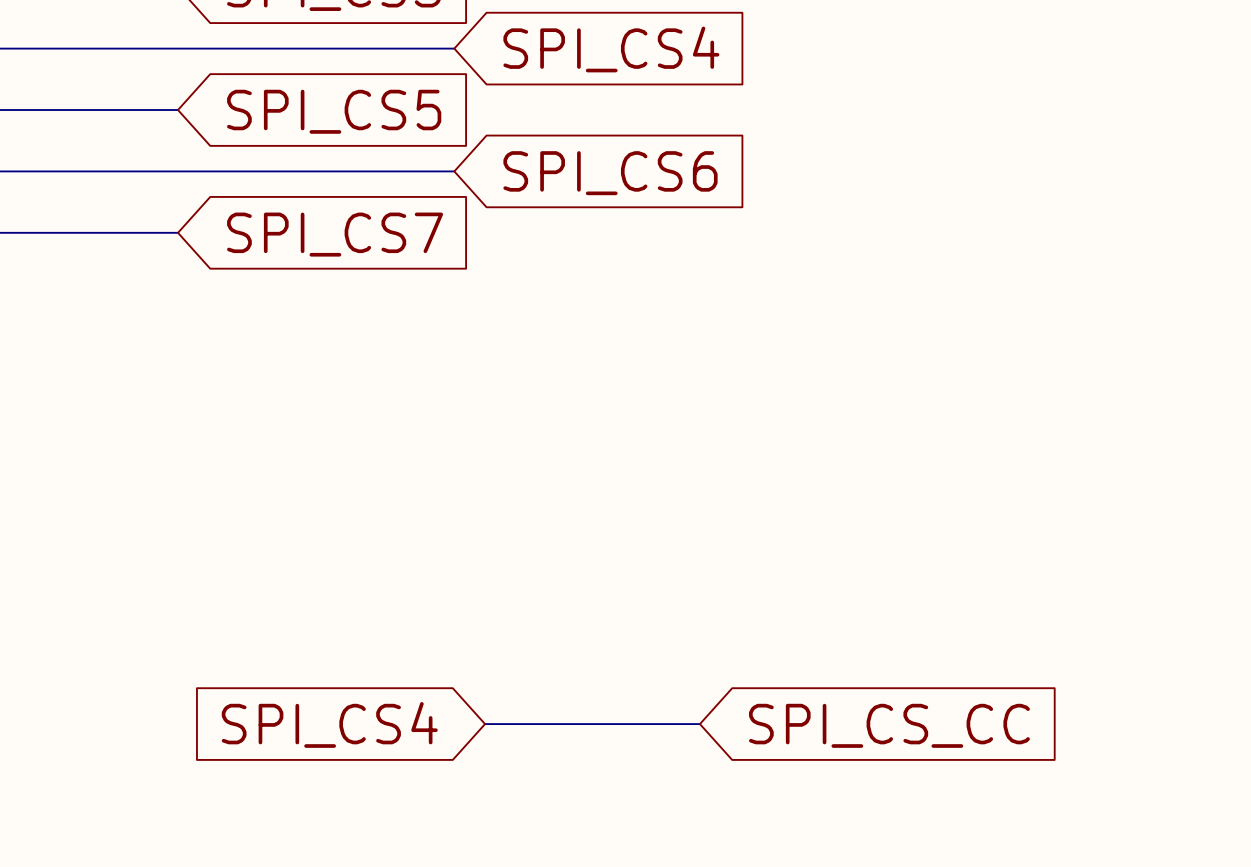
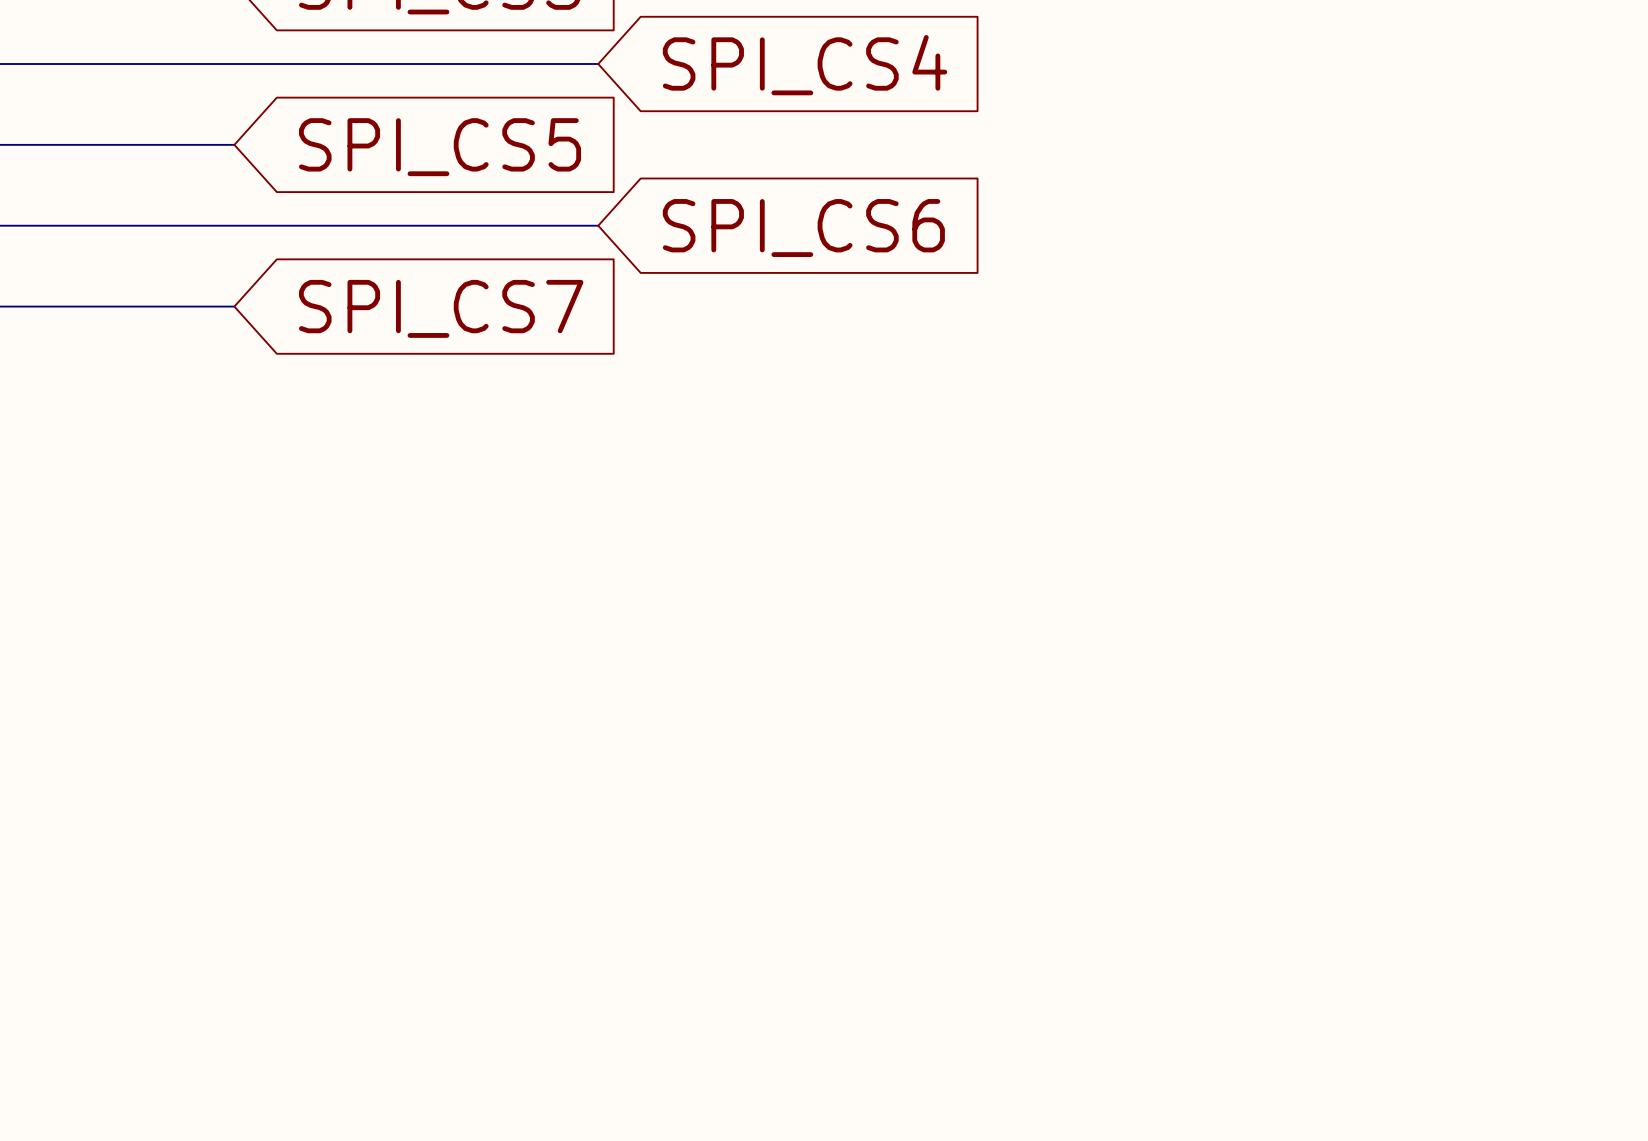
global label: SPI_CS4 (329, 724) -> none
wire: (485, 724) (699, 724) -> none
global label: SPI_CS_CC (889, 725) -> none

